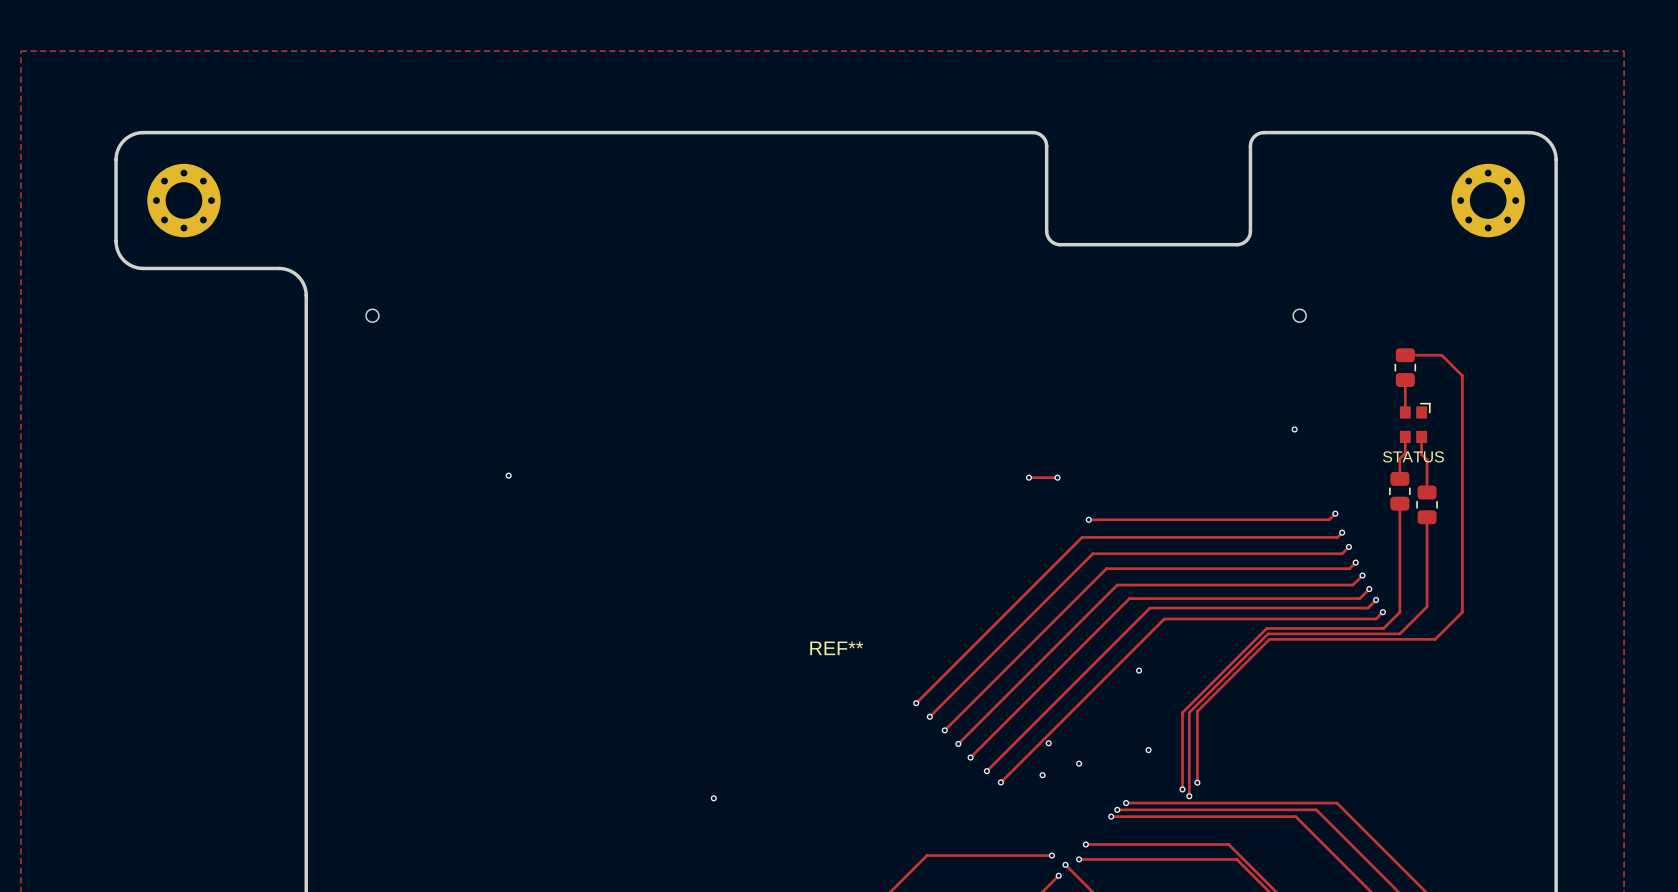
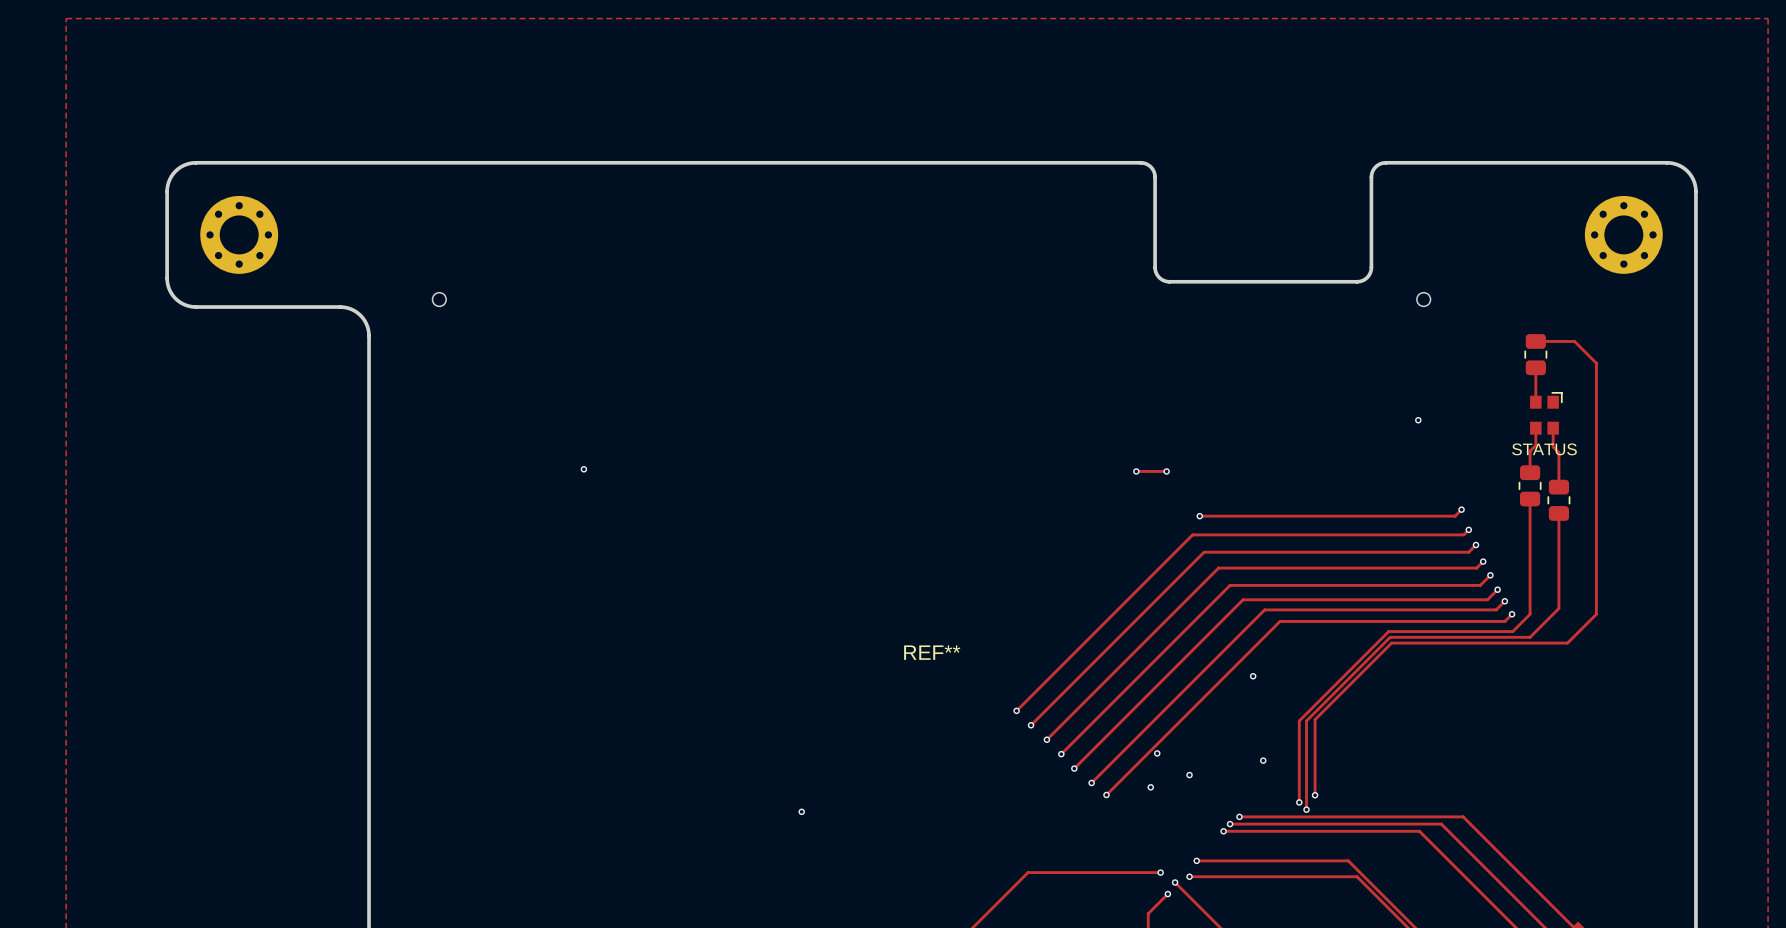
part position: (183, 200) -> (239, 234)
board edge: (1046, 200) (1046, 143) (1041, 135) (1034, 132) (143, 132) (134, 134) (126, 138) (117, 150) (116, 214) -> (1155, 177) (1150, 167) (1140, 162) (195, 162) (183, 165) (175, 171) (168, 182) (167, 191)
board edge: (1250, 200) (1250, 144) (1254, 136) (1261, 132) (1528, 132) (1543, 136) (1550, 142) (1554, 150) (1556, 214) -> (1371, 177) (1375, 167) (1385, 162) (1667, 162) (1676, 164) (1687, 171) (1693, 179) (1695, 191)
part position: (1488, 200) -> (1623, 234)
board edge: (1046, 231) (1050, 240) (1060, 244) (1238, 244) (1246, 240) (1250, 231) -> (1155, 209) (1155, 270) (1160, 278) (1169, 281) (1361, 280) (1368, 276) (1371, 268) (1371, 209)
board edge: (116, 241) (117, 250) (121, 258) (128, 264) (137, 267) (279, 268) (293, 272) (302, 281) (306, 292) (306, 349) -> (167, 220) (167, 281) (171, 293) (180, 302) (195, 307) (346, 307) (355, 311) (362, 317) (367, 326) (369, 335)

